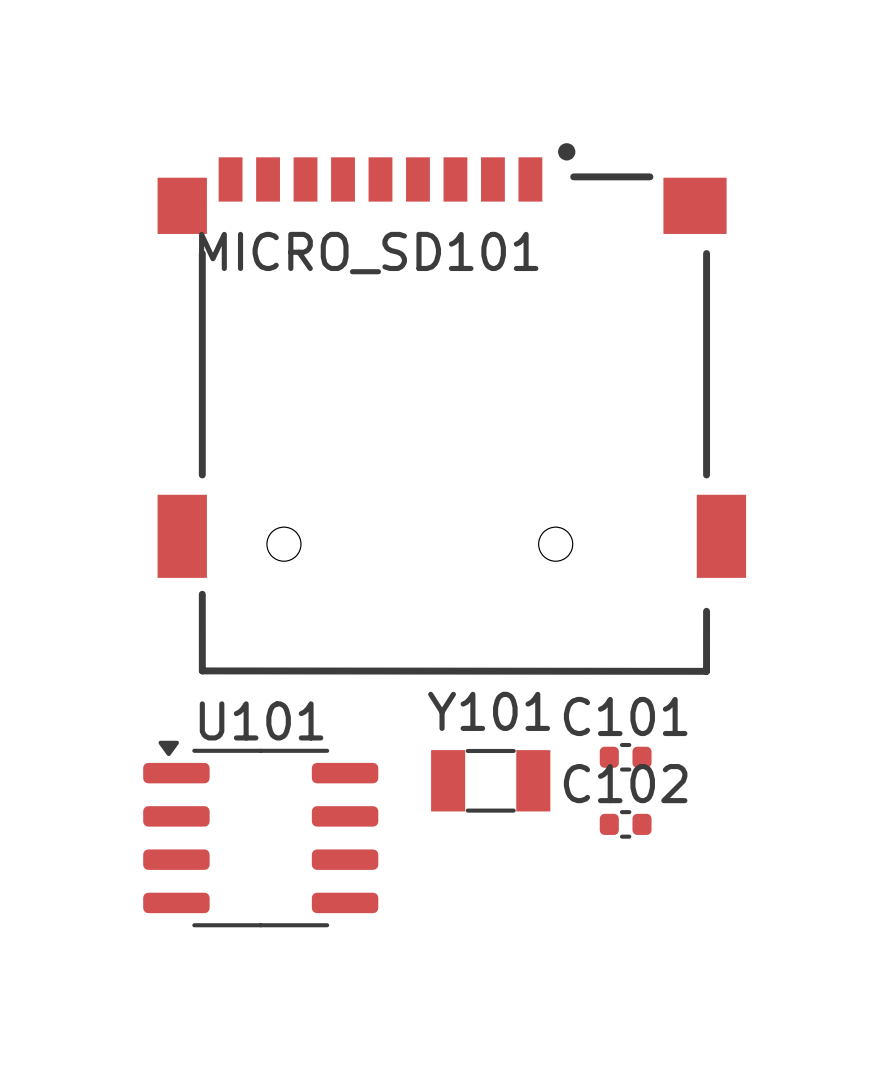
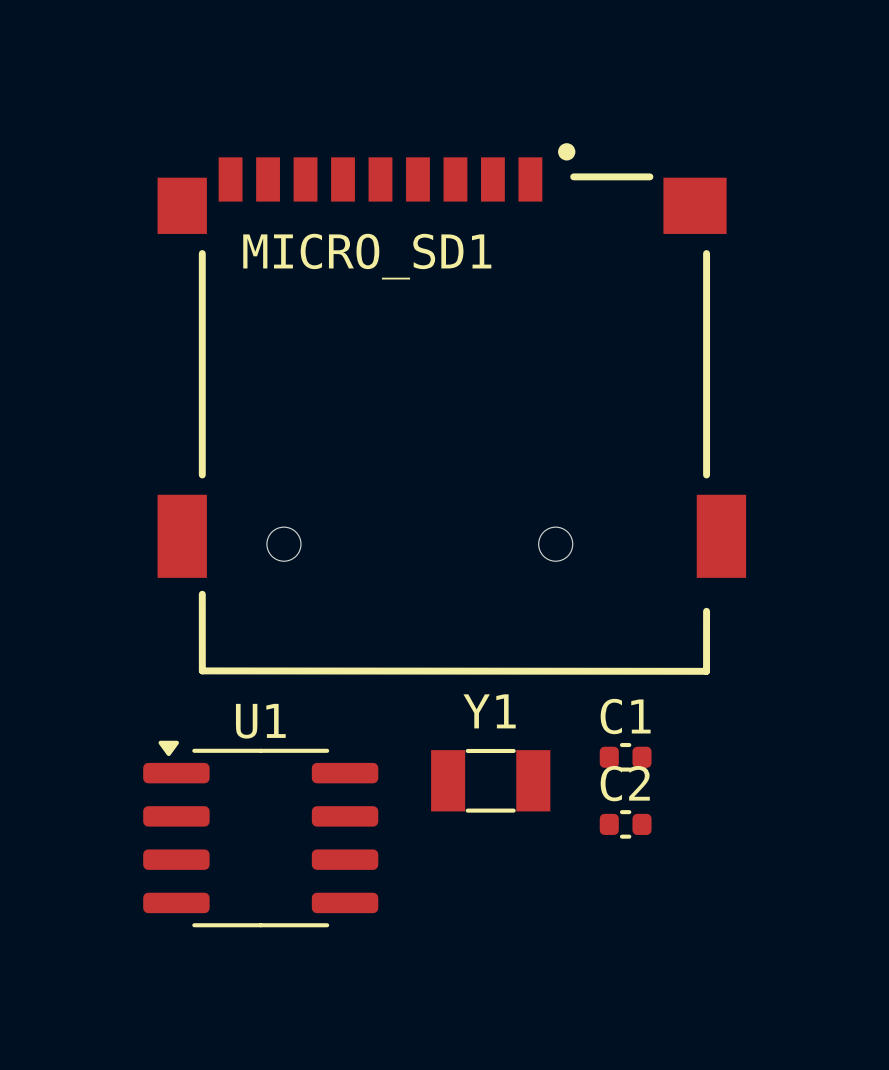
MICRO_SD101 name: MICRO_SD101 (368, 253) -> MICRO_SD1 (367, 256)
Y101 name: Y101 (489, 711) -> Y1 (489, 711)
C101 name: C101 (625, 716) -> C1 (625, 716)
U101 name: U101 (261, 720) -> U1 (260, 721)
C102 name: C102 (625, 783) -> C2 (625, 783)

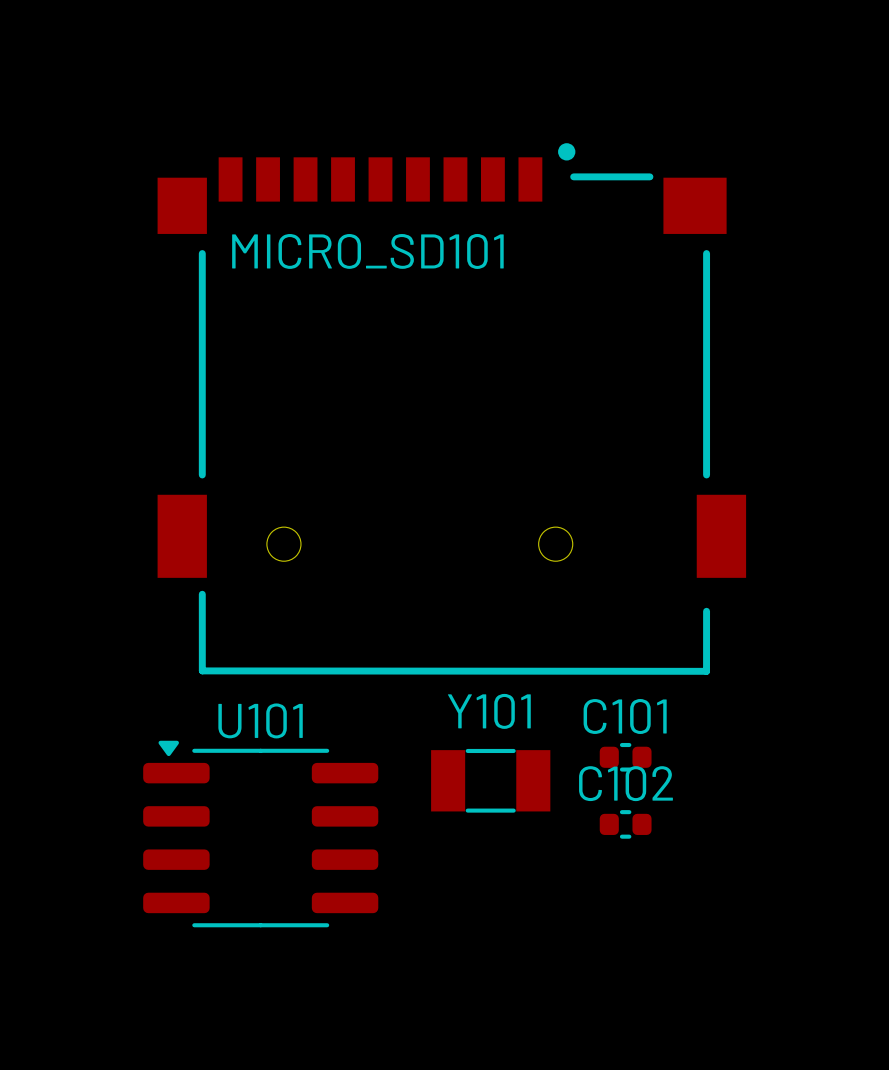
MICRO_SD1 name: MICRO_SD1 (367, 256) -> MICRO_SD101 (367, 251)
Y1 name: Y1 (489, 711) -> Y101 (489, 711)
C1 name: C1 (625, 716) -> C101 (625, 716)
U1 name: U1 (260, 721) -> U101 (260, 720)
C2 name: C2 (625, 783) -> C102 (625, 783)

